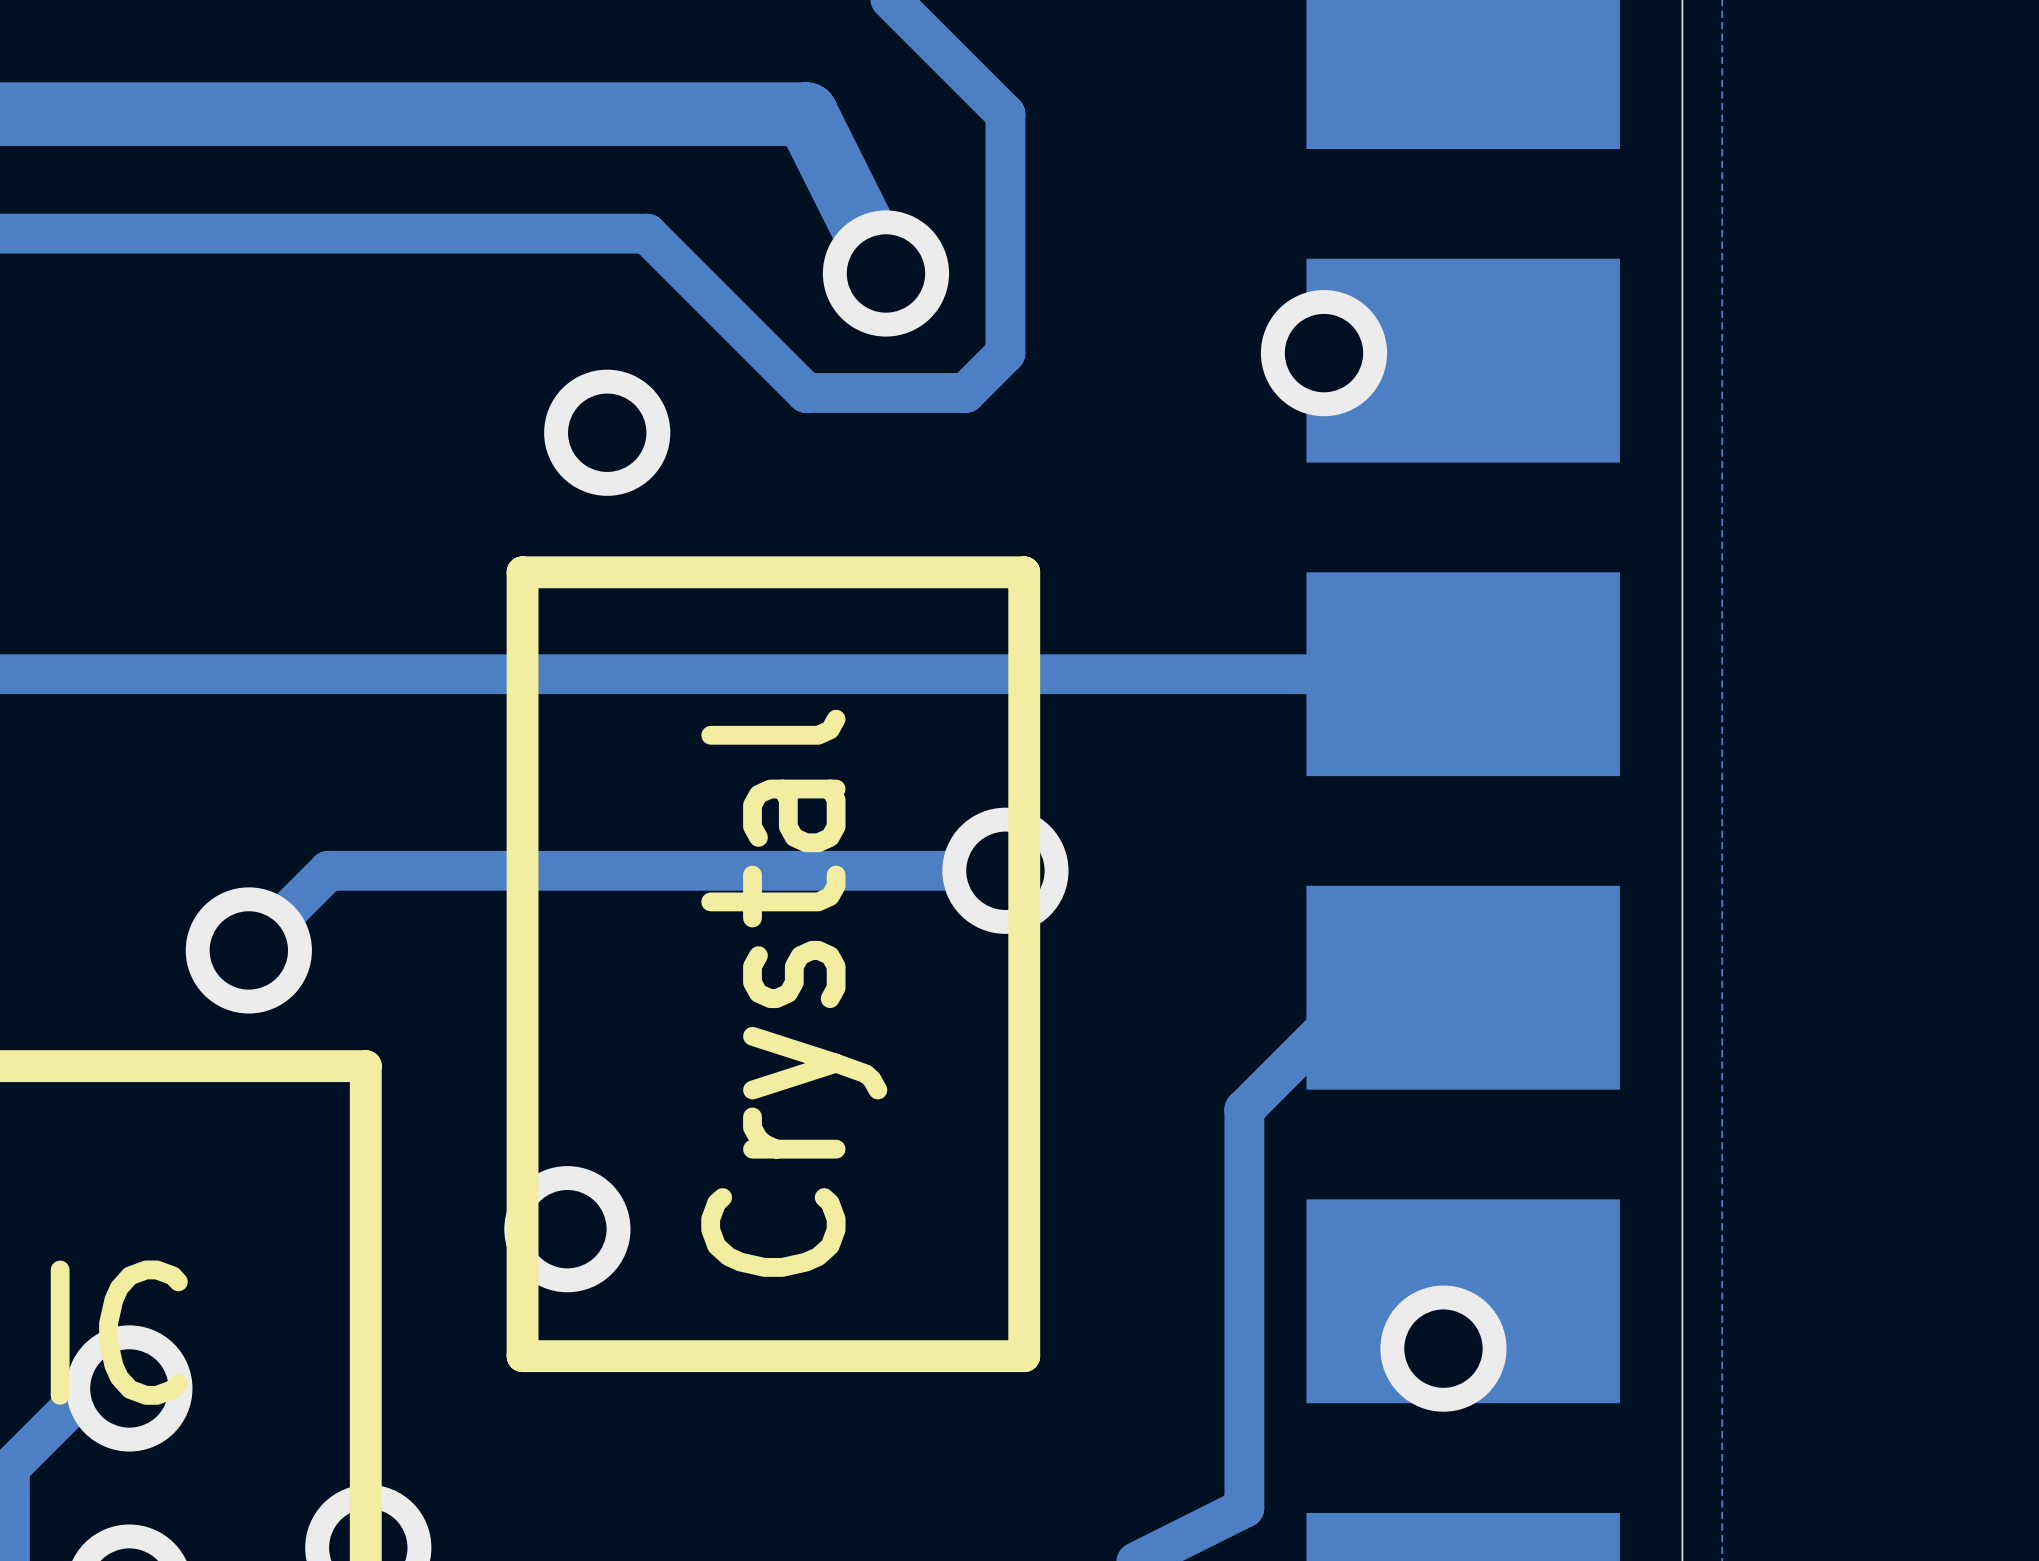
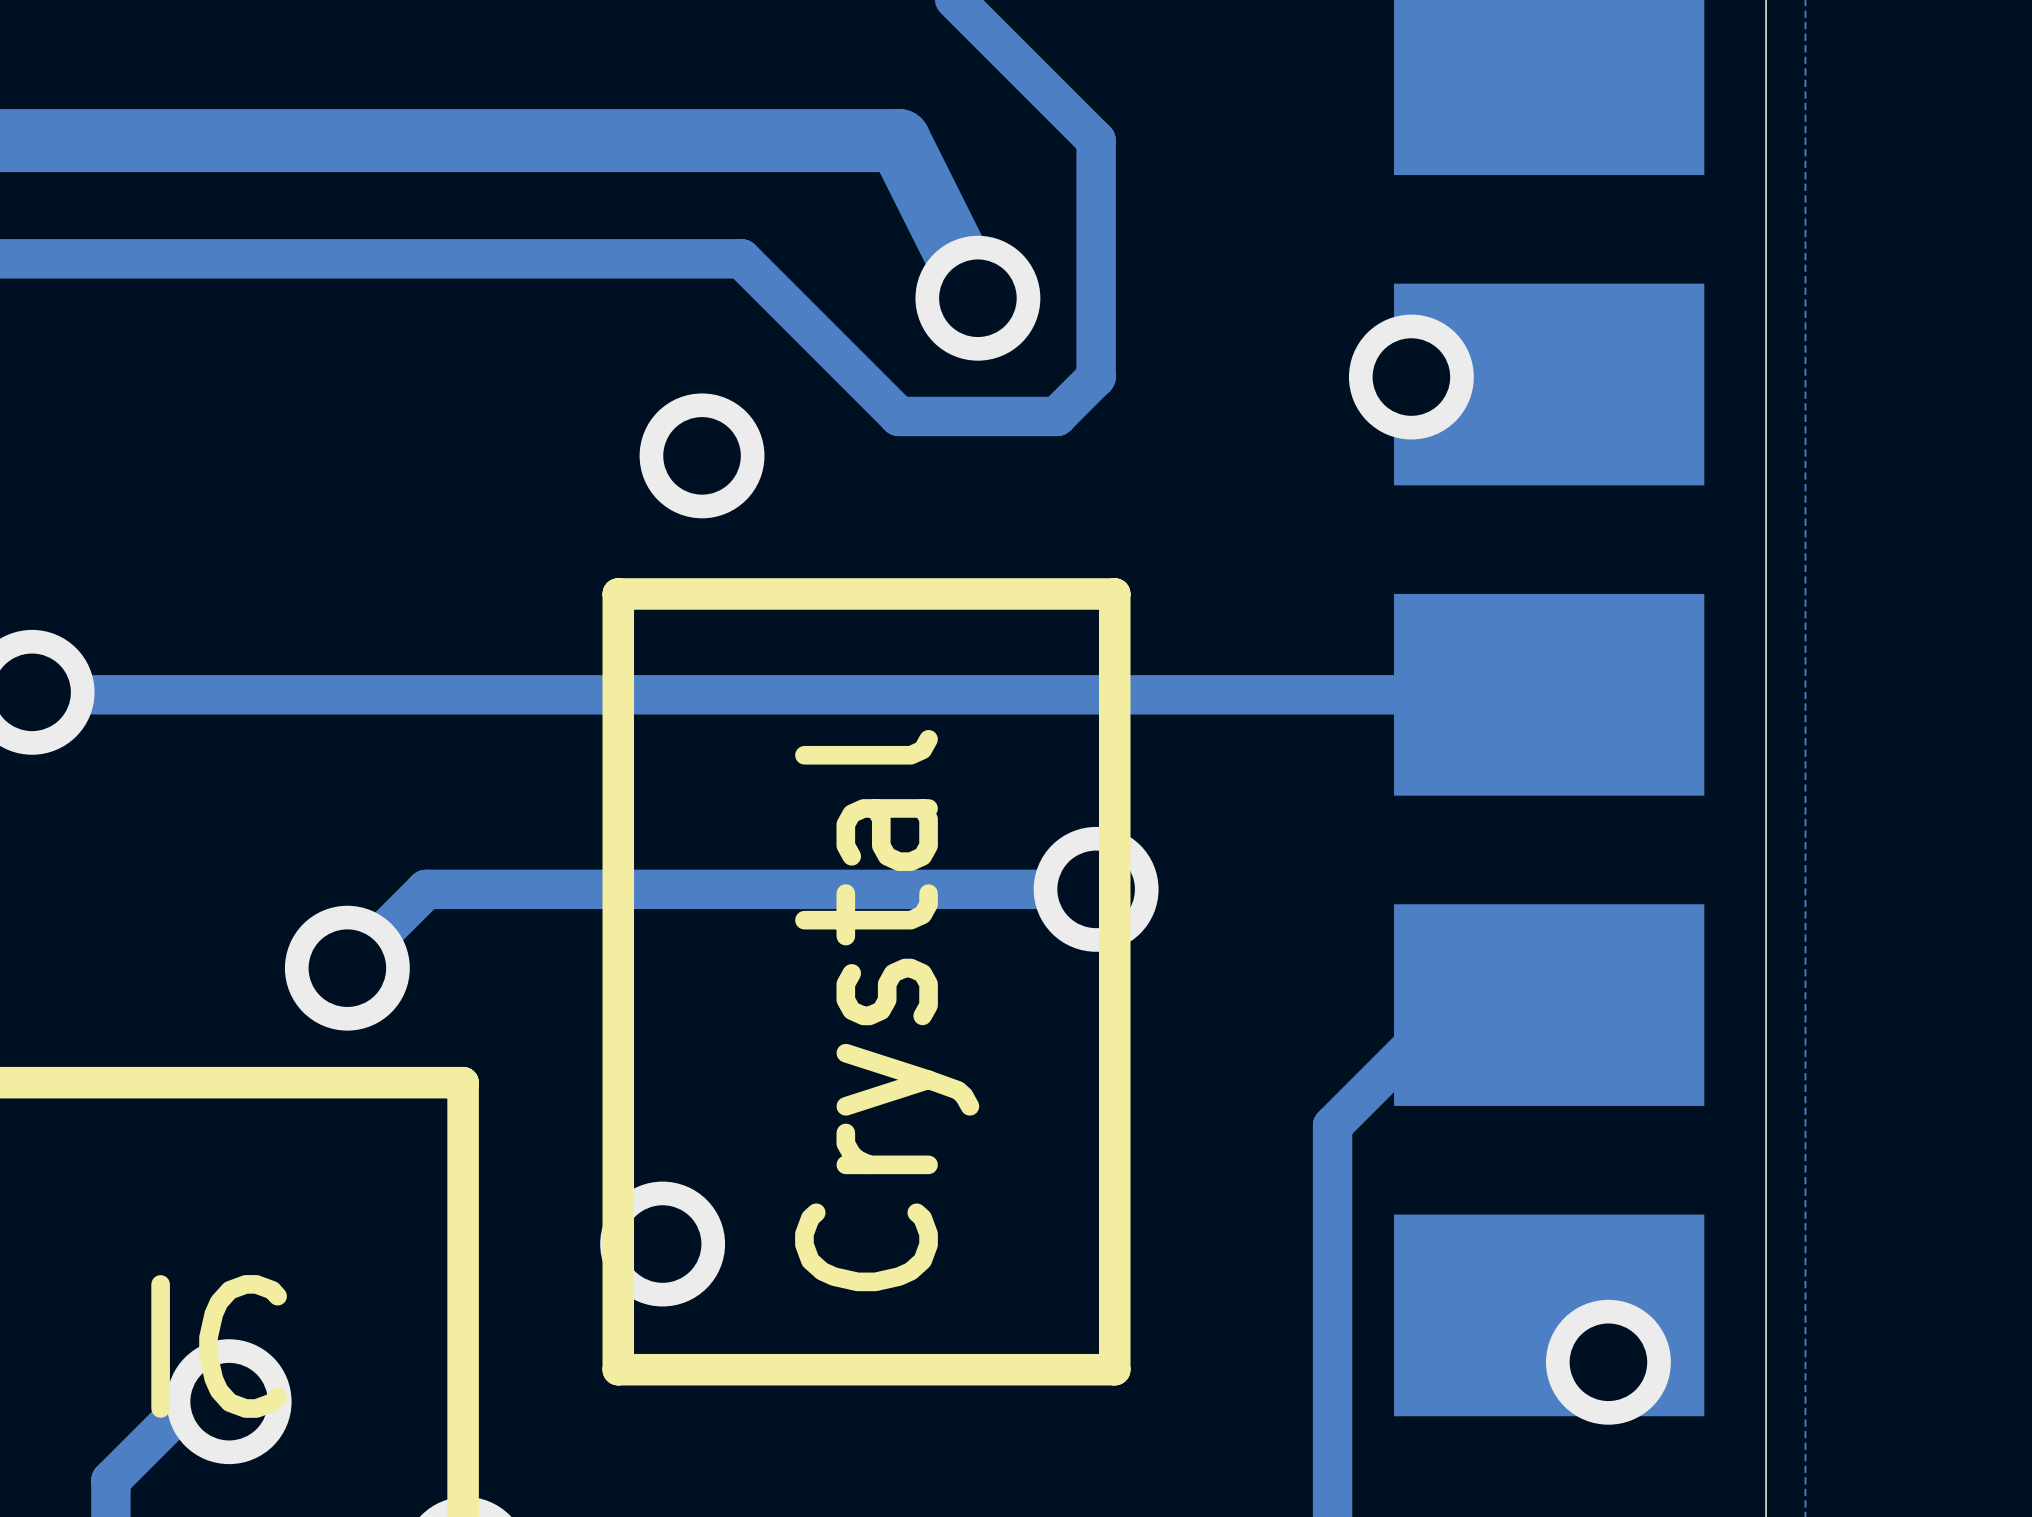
via position: (1443, 1348) -> (1608, 1362)

